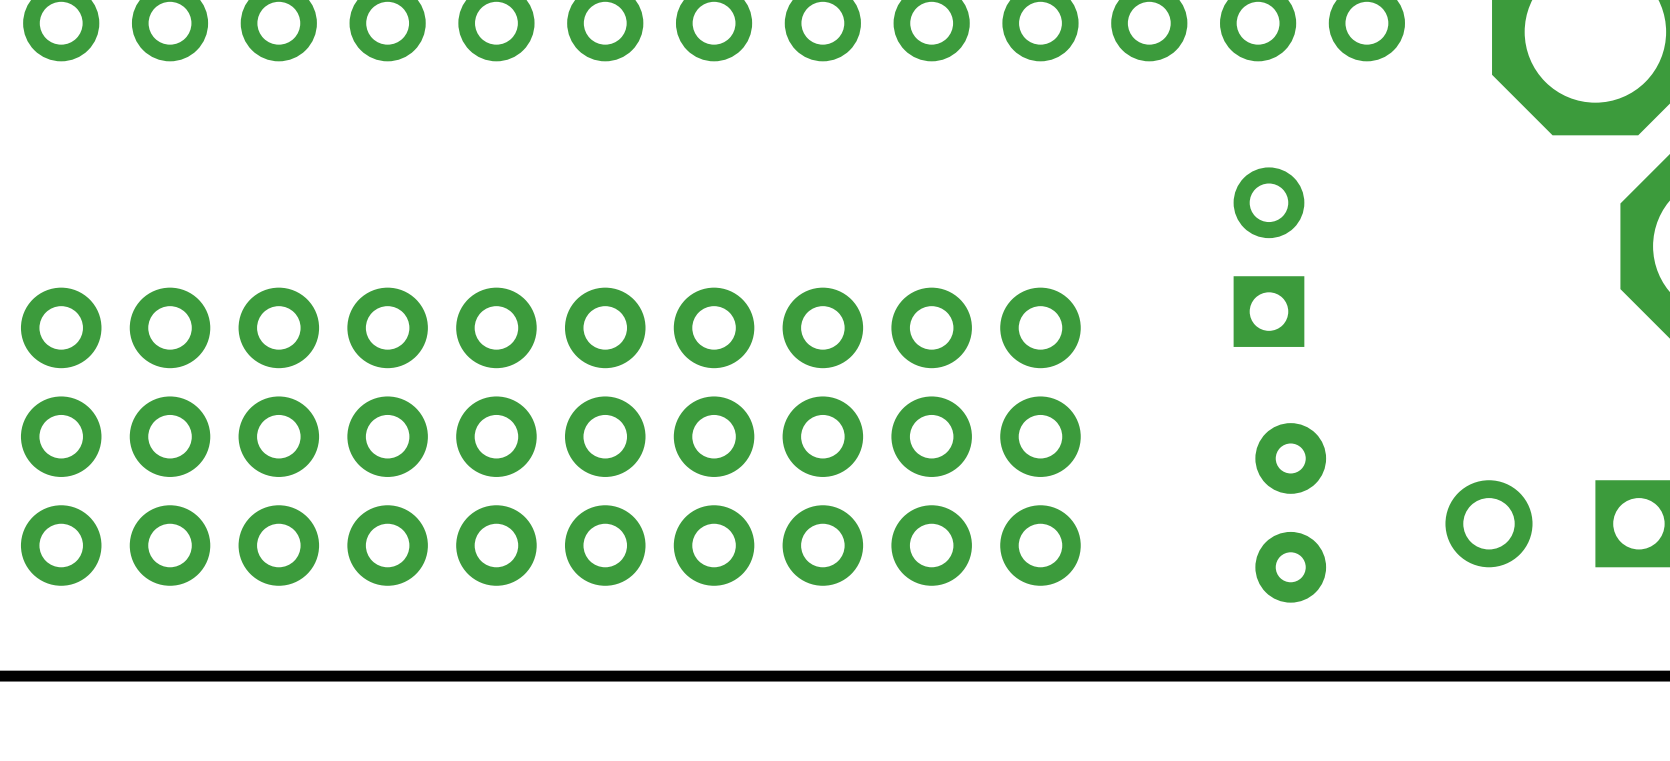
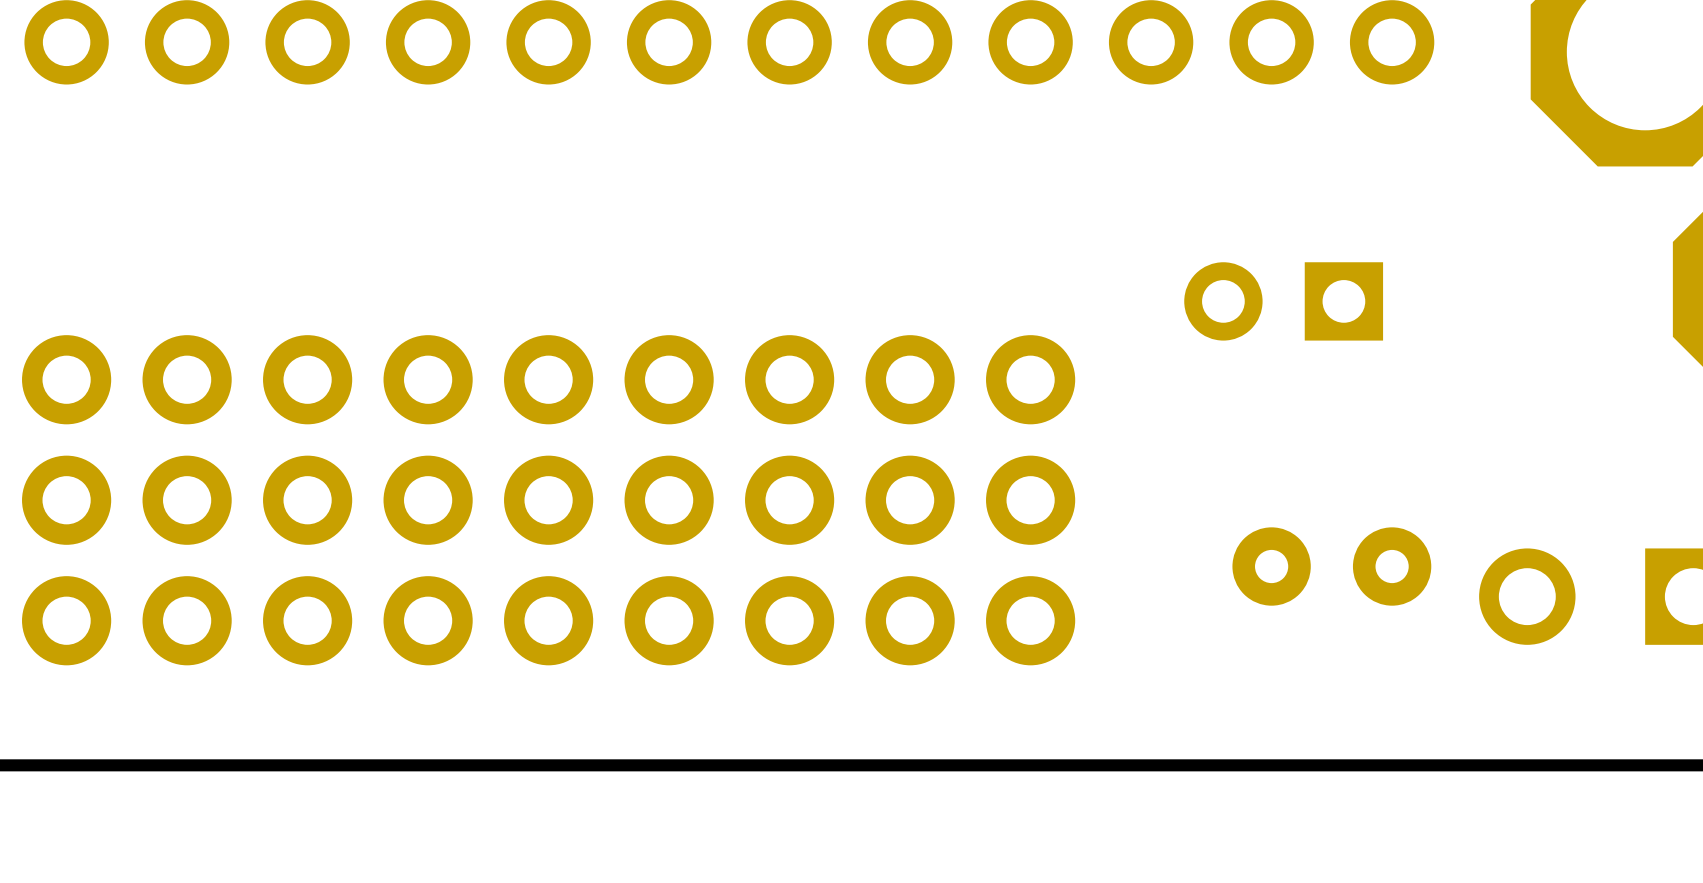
part rotation: 0° (1268, 257) -> 90° counterclockwise (1283, 301)
part rotation: 0° (1290, 512) -> 90° clockwise (1331, 566)

